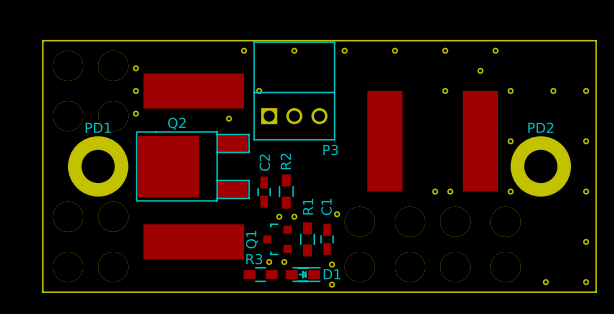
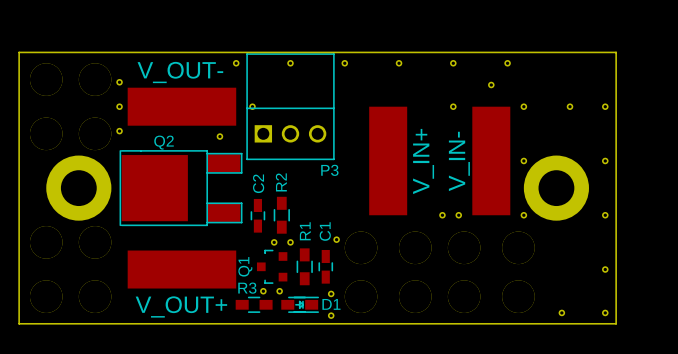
text: none -> V_OUT- (180, 72)
PD1 name: PD1 (98, 127) -> none
PD2 name: PD2 (540, 127) -> none
text: none -> V_IN- (459, 161)
text: none -> V_IN+ (423, 161)
text: none -> V_OUT+ (181, 306)

